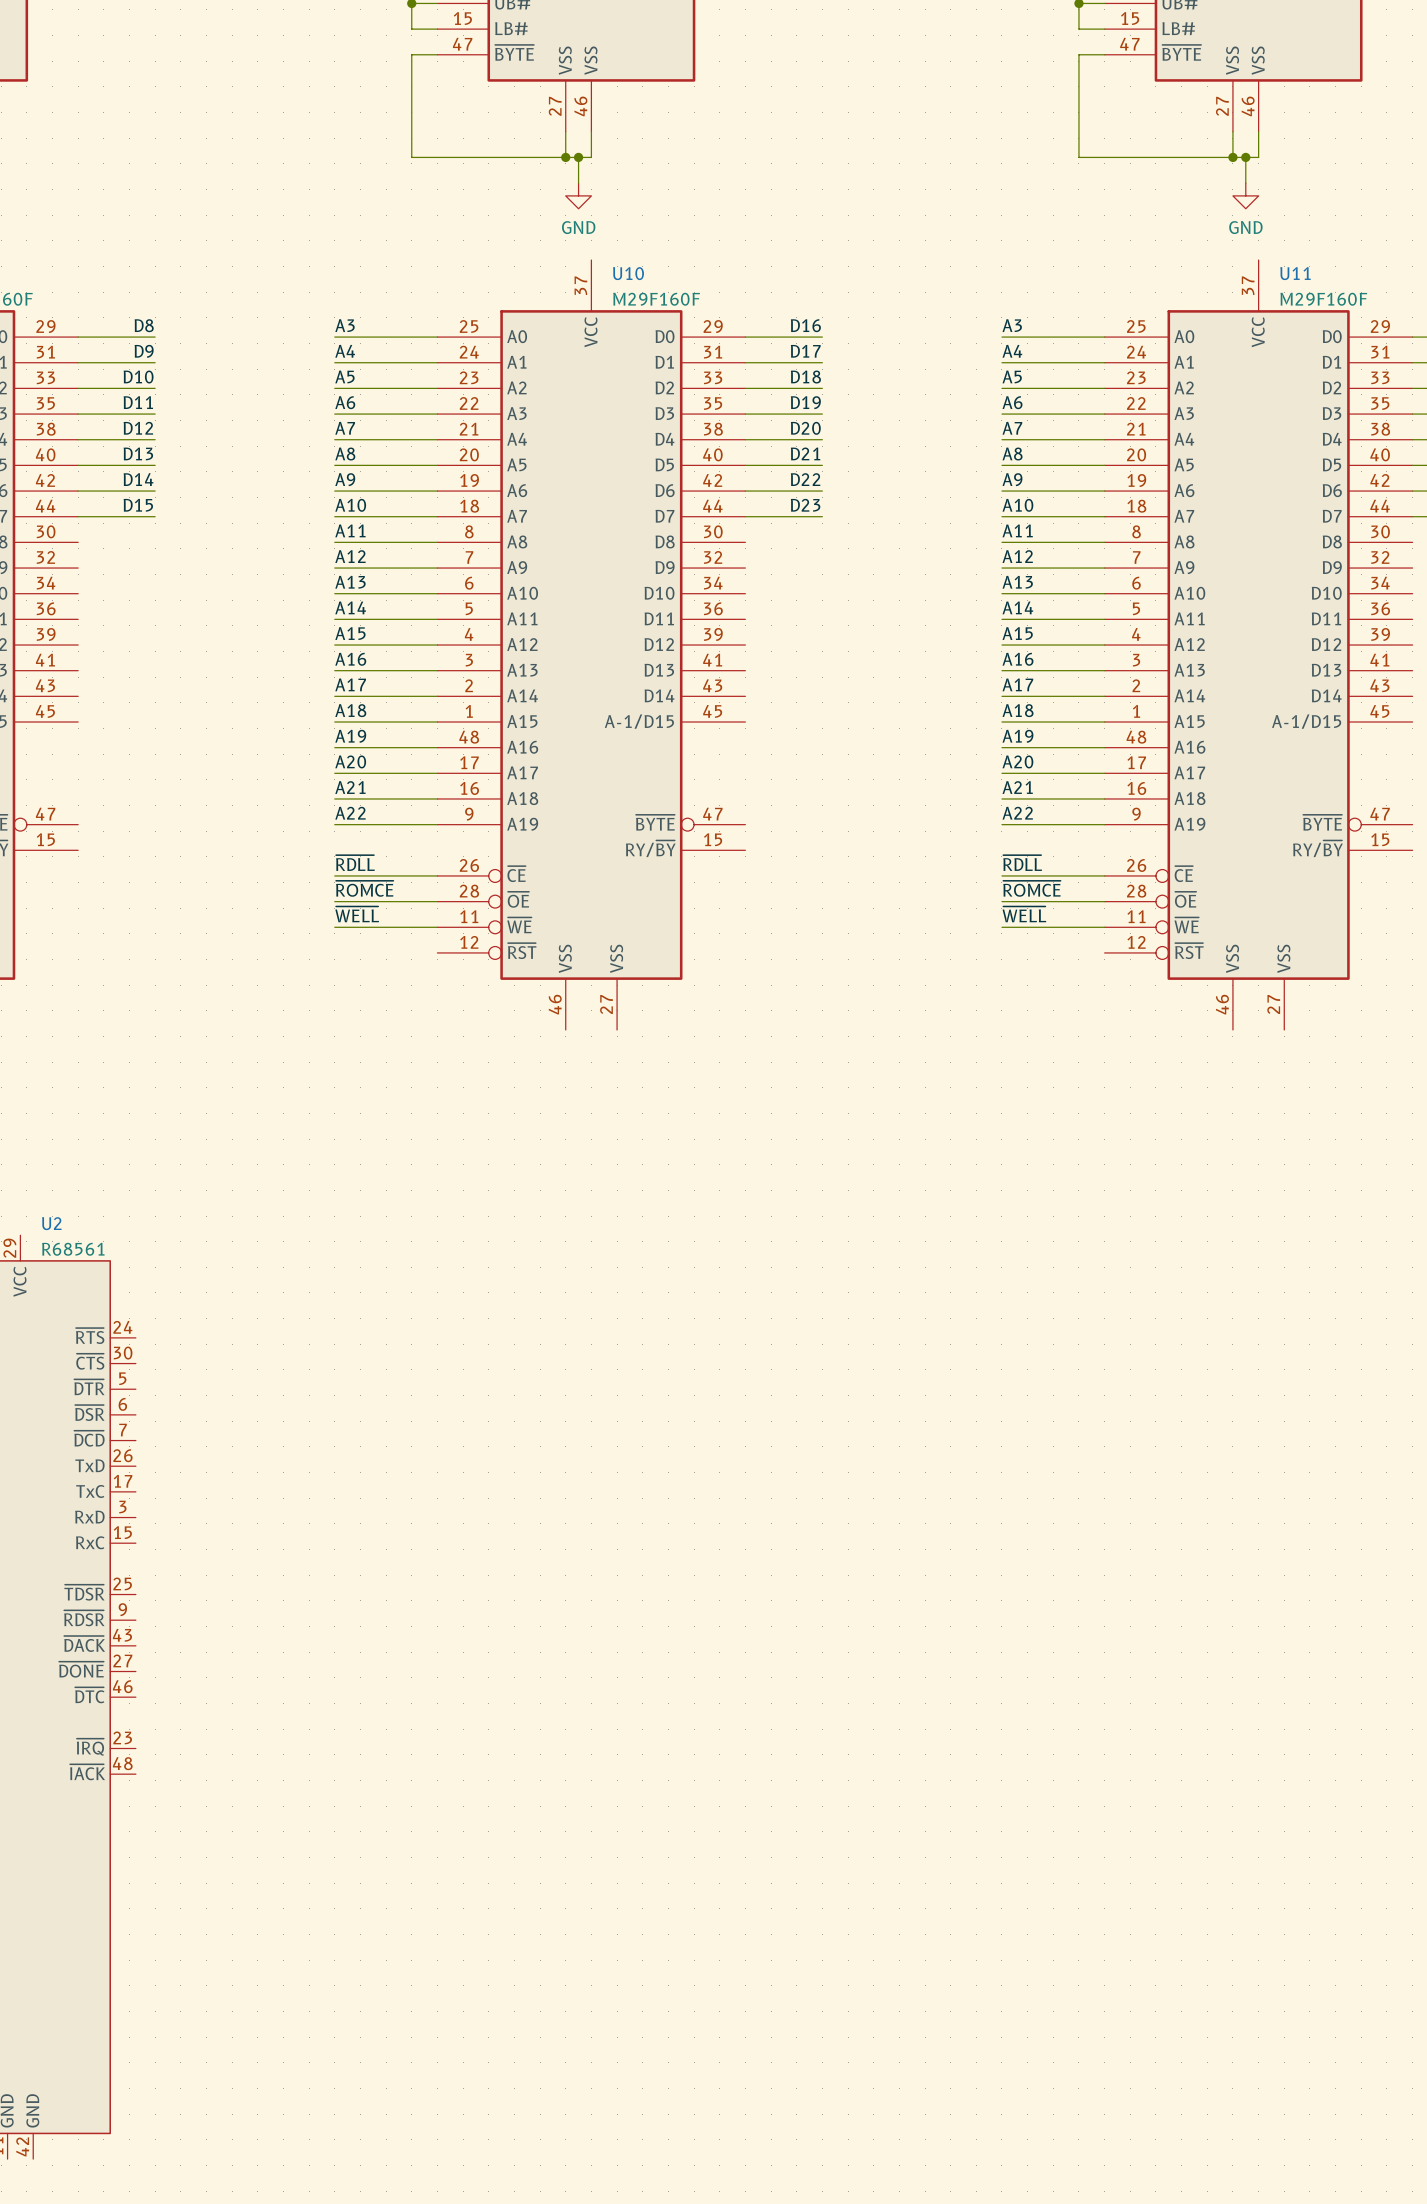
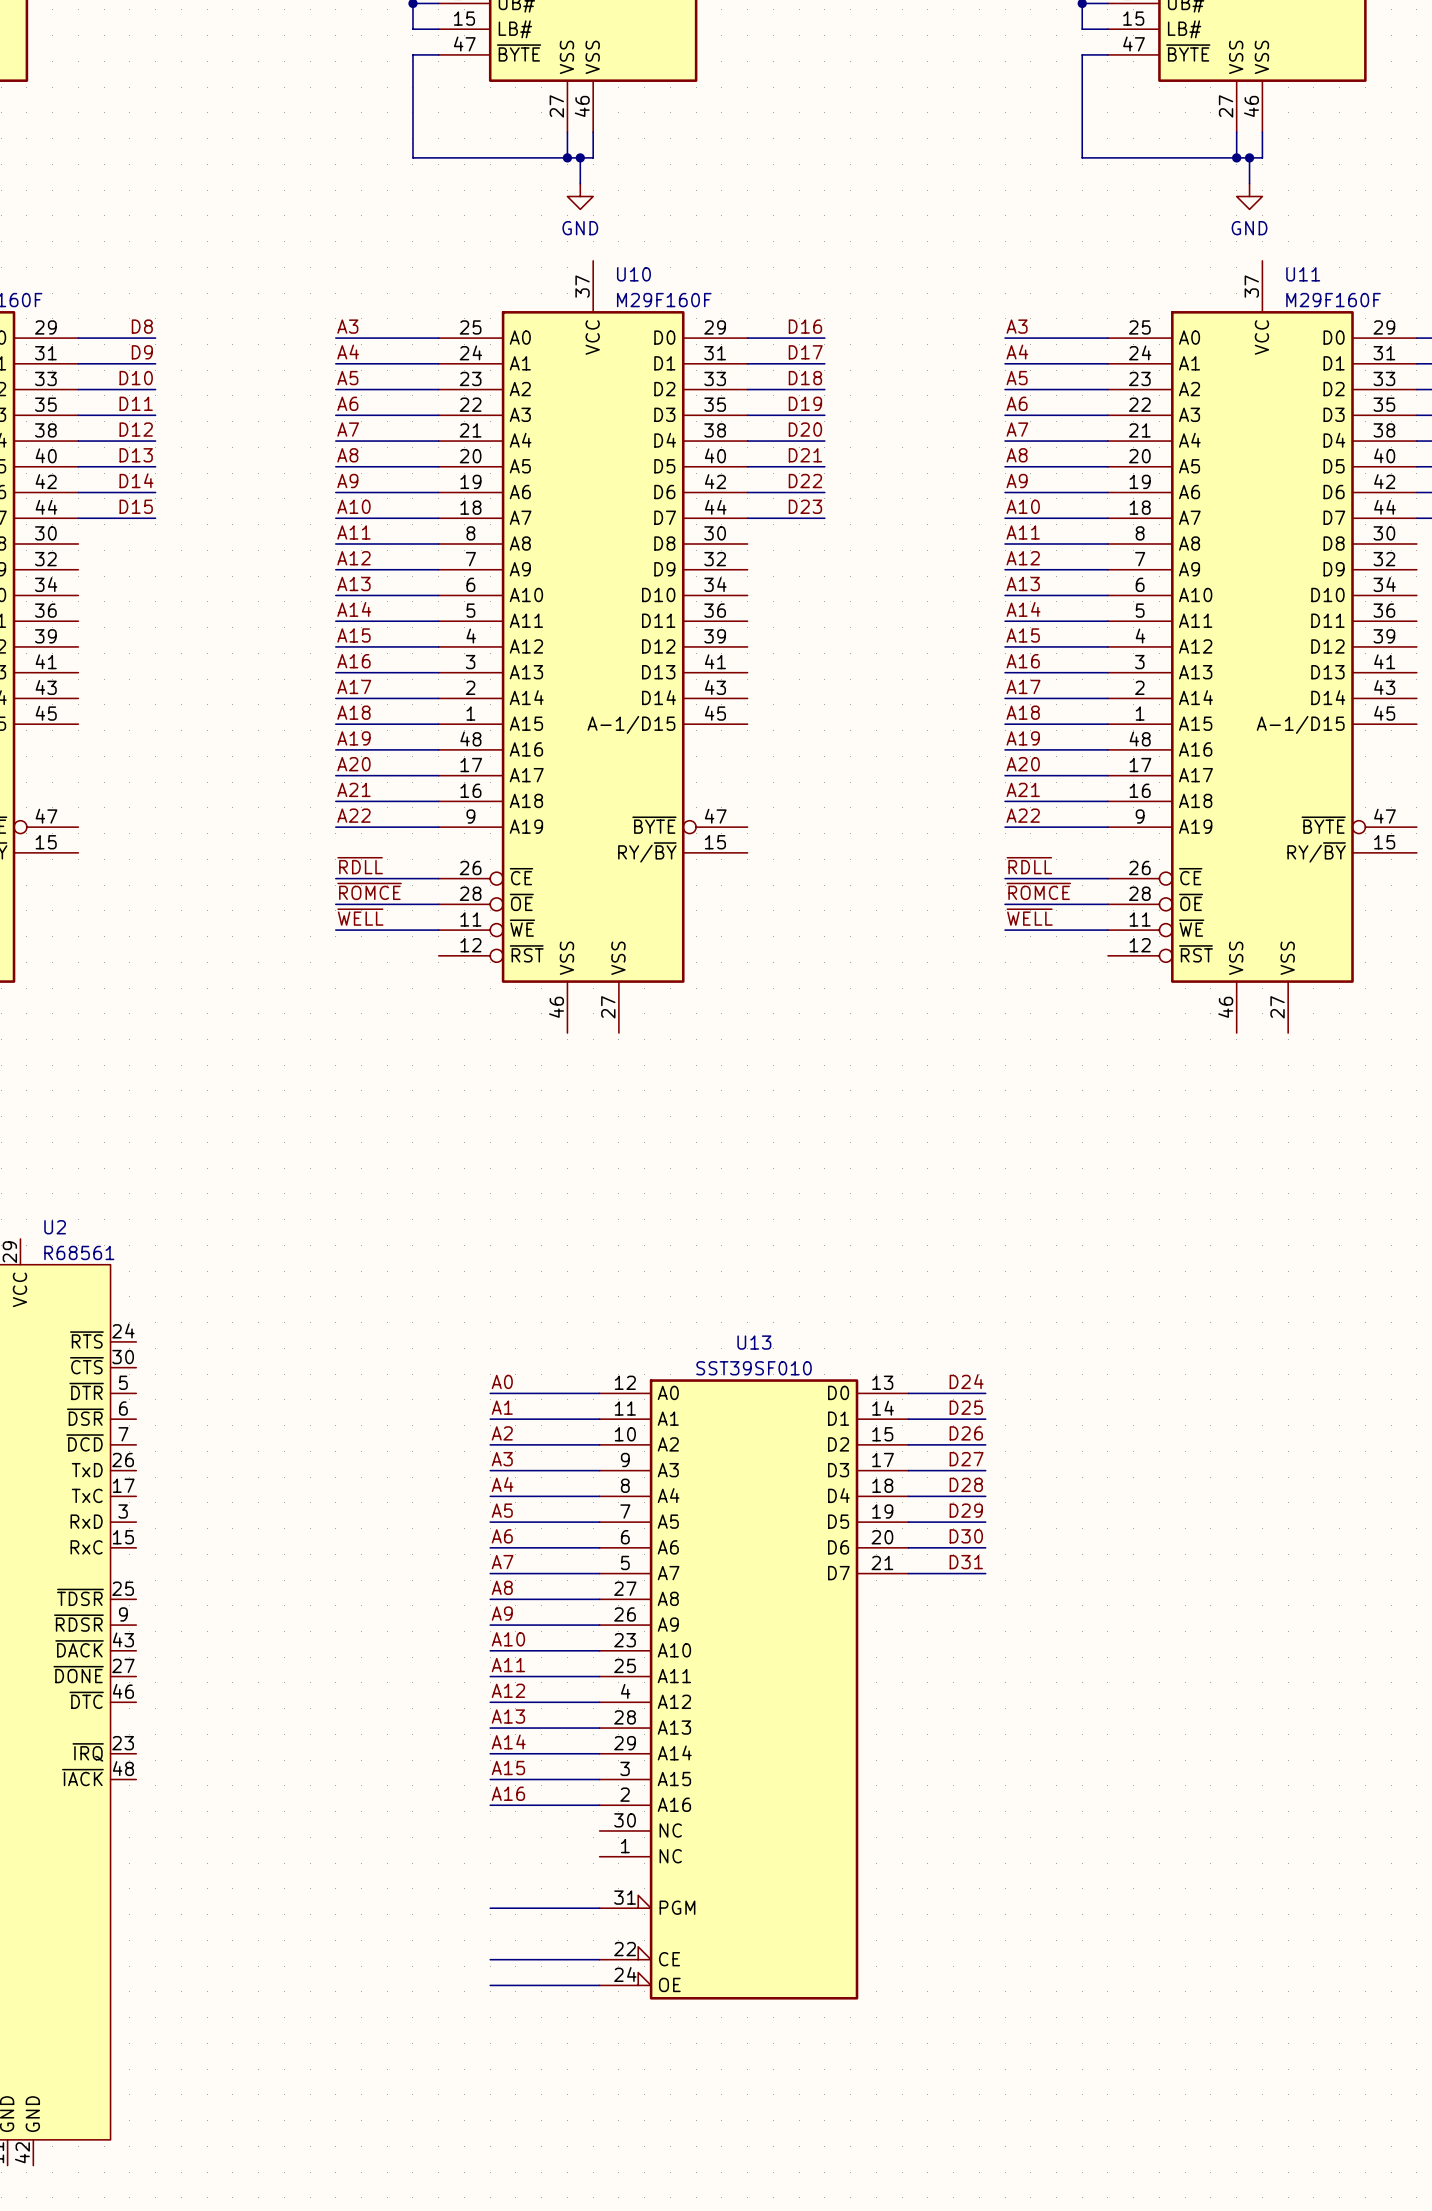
label: none -> A0 (502, 1381)
label: none -> D24 (966, 1381)
wire: none -> (490, 1393) (599, 1393)
wire: none -> (908, 1393) (985, 1393)
label: none -> A1 (502, 1407)
label: none -> D25 (966, 1407)
wire: none -> (490, 1419) (599, 1419)
wire: none -> (908, 1419) (985, 1419)
label: none -> A2 (502, 1433)
label: none -> D26 (966, 1433)
wire: none -> (490, 1444) (599, 1444)
wire: none -> (908, 1444) (985, 1444)
label: none -> A3 (502, 1459)
label: none -> D27 (966, 1459)
wire: none -> (490, 1470) (599, 1470)
wire: none -> (908, 1470) (985, 1470)
label: none -> A4 (502, 1484)
label: none -> D28 (966, 1484)
wire: none -> (490, 1496) (599, 1496)
wire: none -> (908, 1496) (985, 1496)
label: none -> A5 (502, 1510)
label: none -> D29 (966, 1510)
wire: none -> (490, 1522) (599, 1522)
wire: none -> (908, 1522) (985, 1522)
label: none -> A6 (502, 1536)
label: none -> D30 (966, 1536)
wire: none -> (490, 1547) (599, 1547)
wire: none -> (908, 1547) (985, 1547)
label: none -> A7 (502, 1562)
label: none -> D31 (966, 1562)
wire: none -> (490, 1573) (599, 1573)
wire: none -> (908, 1573) (985, 1573)
label: none -> A8 (502, 1587)
wire: none -> (490, 1599) (599, 1599)
label: none -> A9 (502, 1613)
wire: none -> (490, 1625) (599, 1625)
label: none -> A10 (508, 1639)
wire: none -> (490, 1650) (599, 1650)
label: none -> A11 (508, 1665)
wire: none -> (490, 1676) (599, 1676)
U13: none -> SST39SF010 (754, 1689)
label: none -> A12 (508, 1690)
wire: none -> (490, 1702) (599, 1702)
label: none -> A13 (508, 1716)
wire: none -> (490, 1728) (599, 1728)
label: none -> A14 (508, 1741)
wire: none -> (490, 1753) (599, 1753)
label: none -> A15 (508, 1768)
wire: none -> (490, 1779) (599, 1779)
label: none -> A16 (508, 1793)
wire: none -> (490, 1805) (599, 1805)
wire: none -> (490, 1908) (599, 1908)
wire: none -> (490, 1959) (599, 1959)
wire: none -> (490, 1985) (599, 1985)

